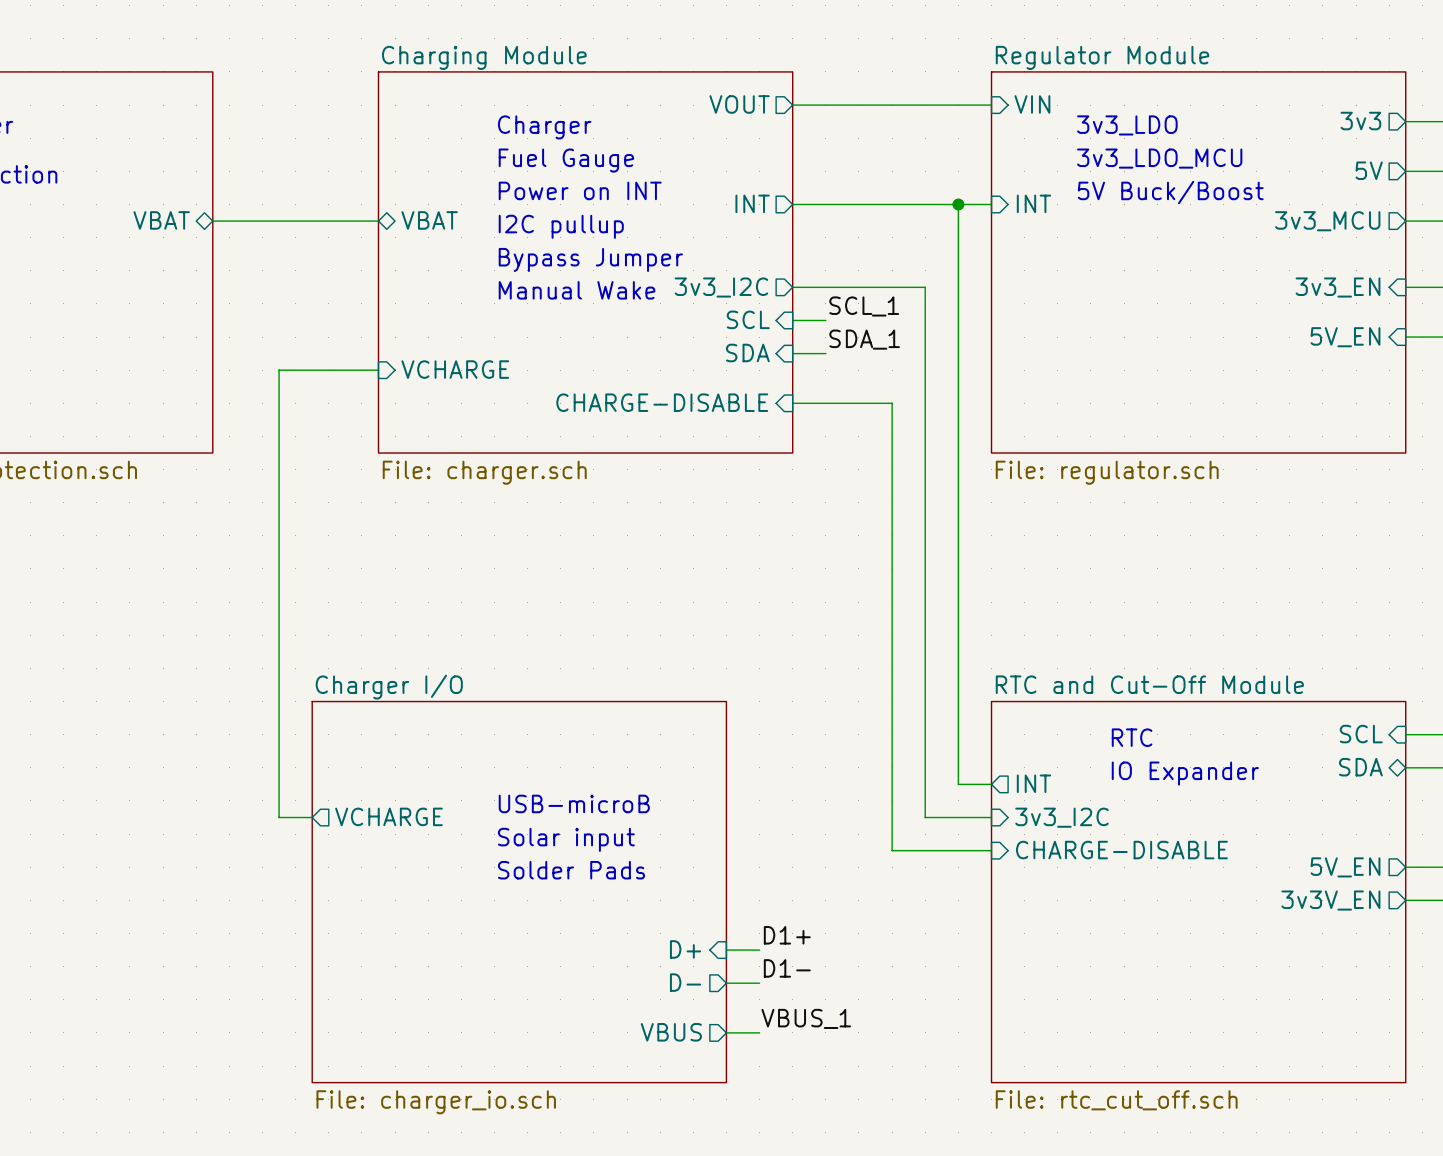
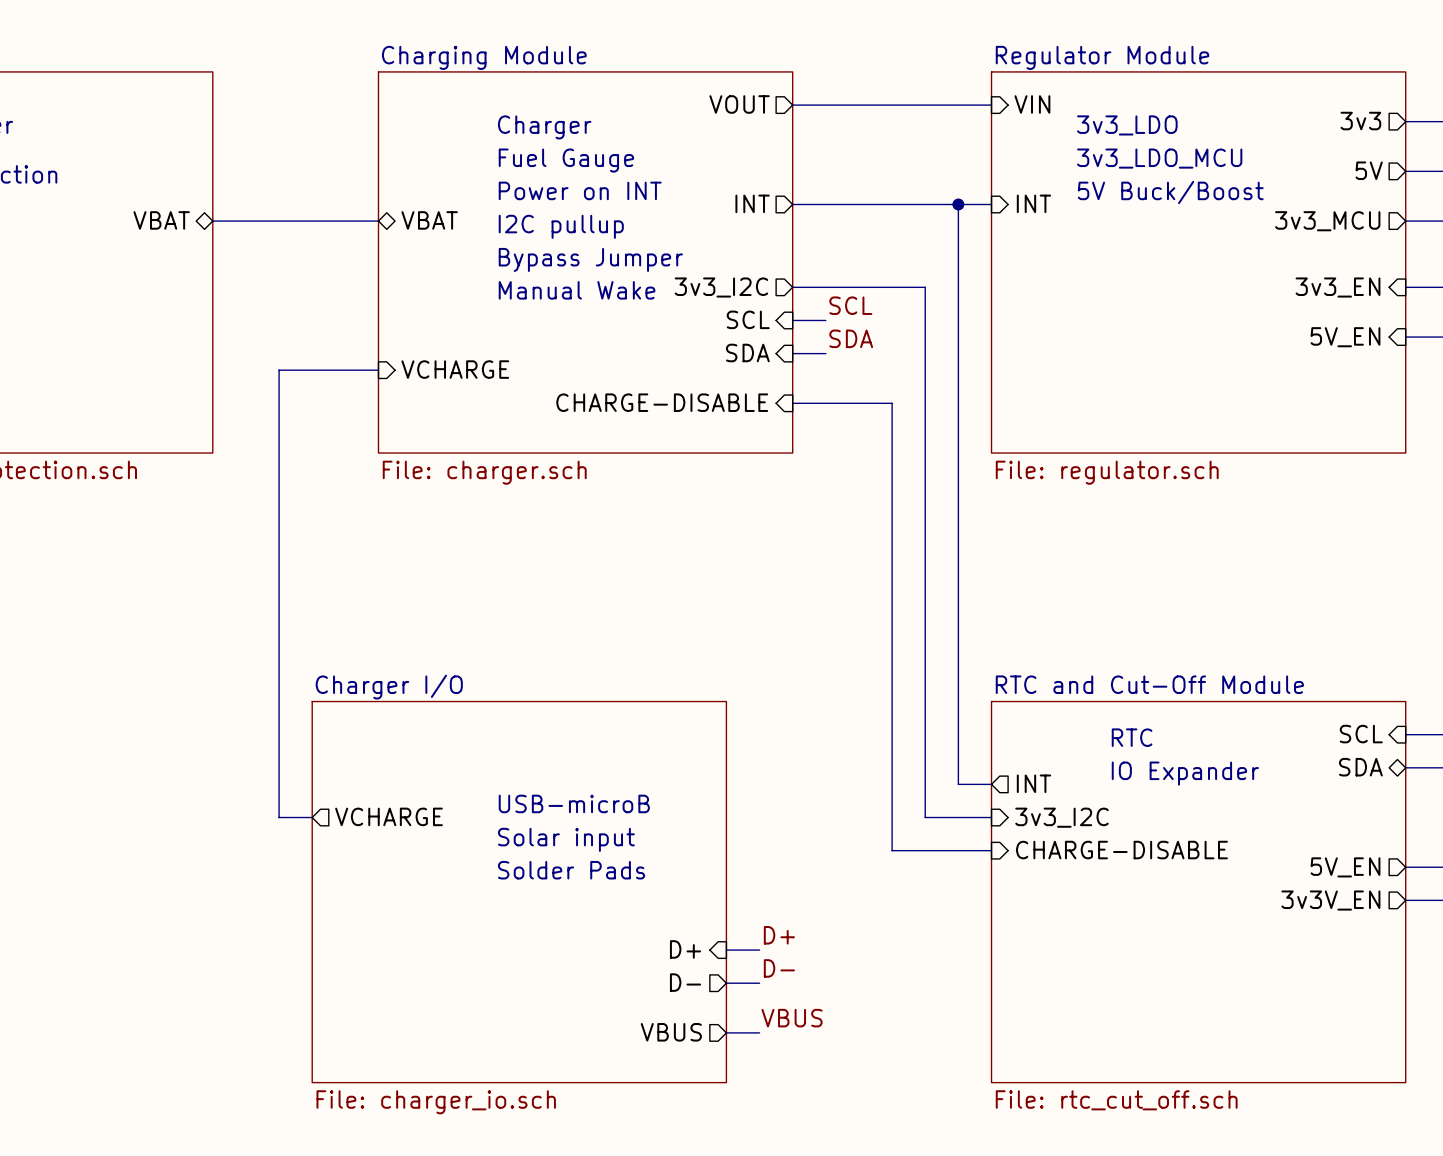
label: SCL_1 (864, 306) -> SCL (850, 305)
label: SDA_1 (864, 339) -> SDA (851, 338)
label: D1+ (787, 935) -> D+ (779, 935)
label: D1- (787, 968) -> D- (779, 968)
label: VBUS_1 (806, 1018) -> VBUS (792, 1018)

